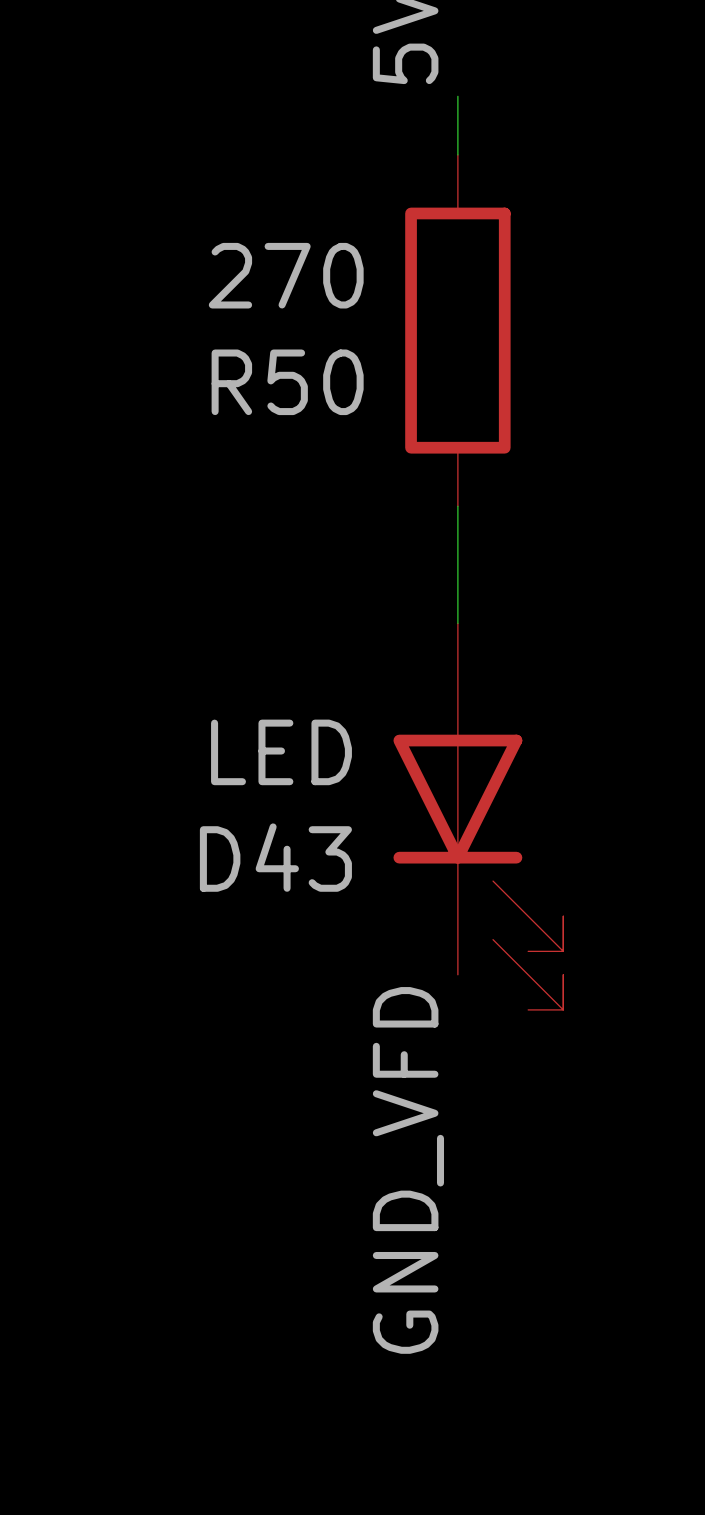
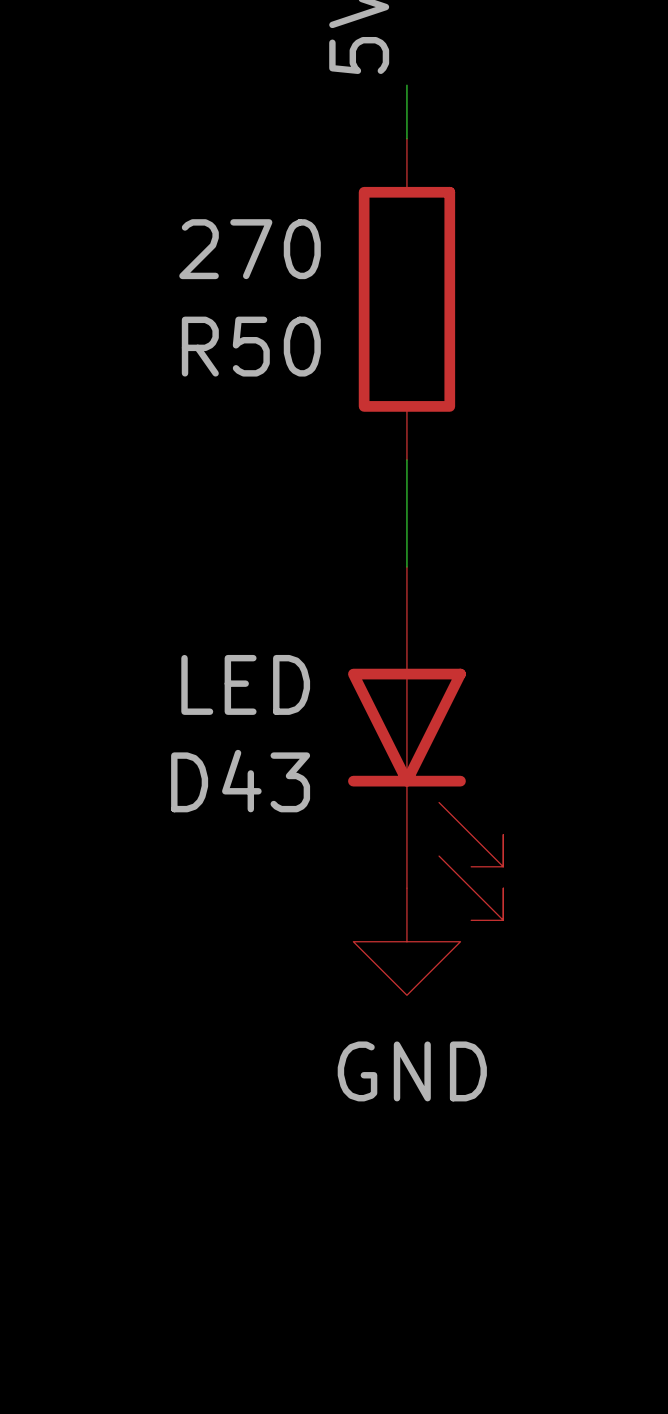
power symbol: none -> GND (406, 941)
label: GND_VFD (408, 1170) -> none

